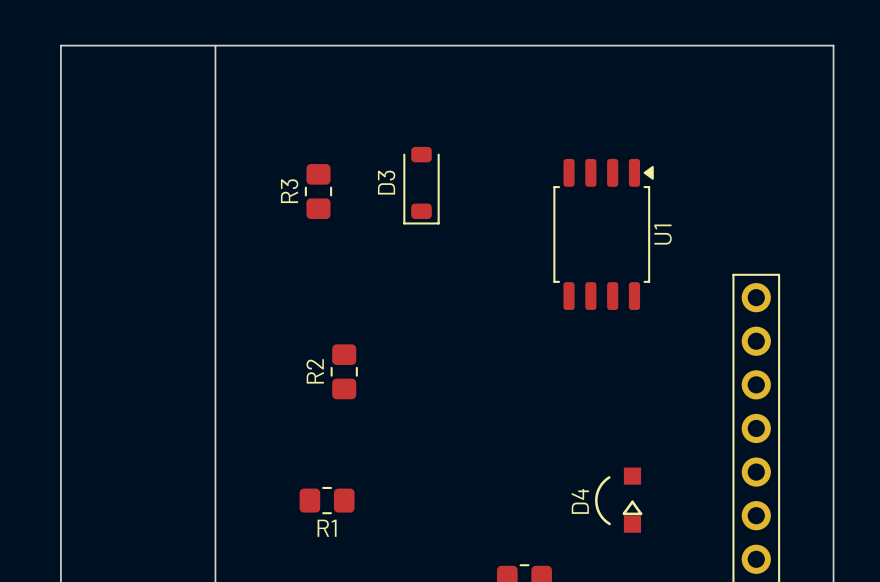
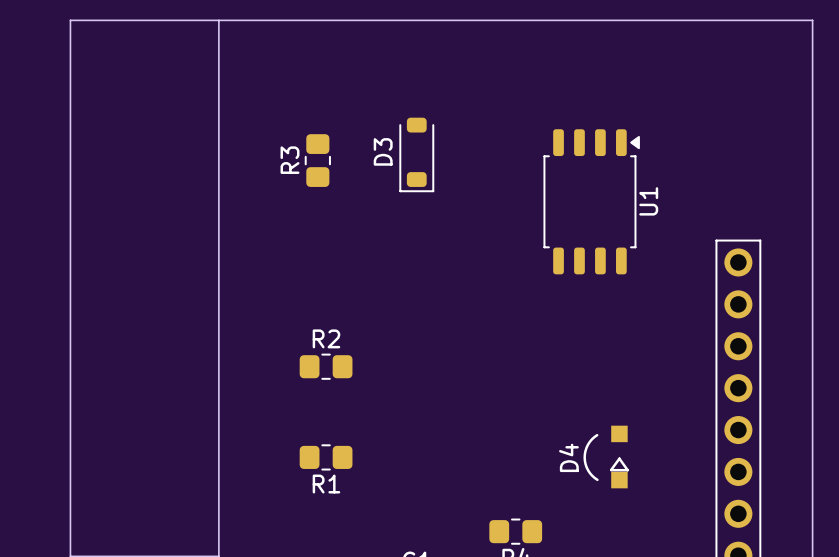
R2 rotation: 0° (344, 371) -> 90° clockwise (326, 366)
R2 position: (344, 371) -> (326, 366)

